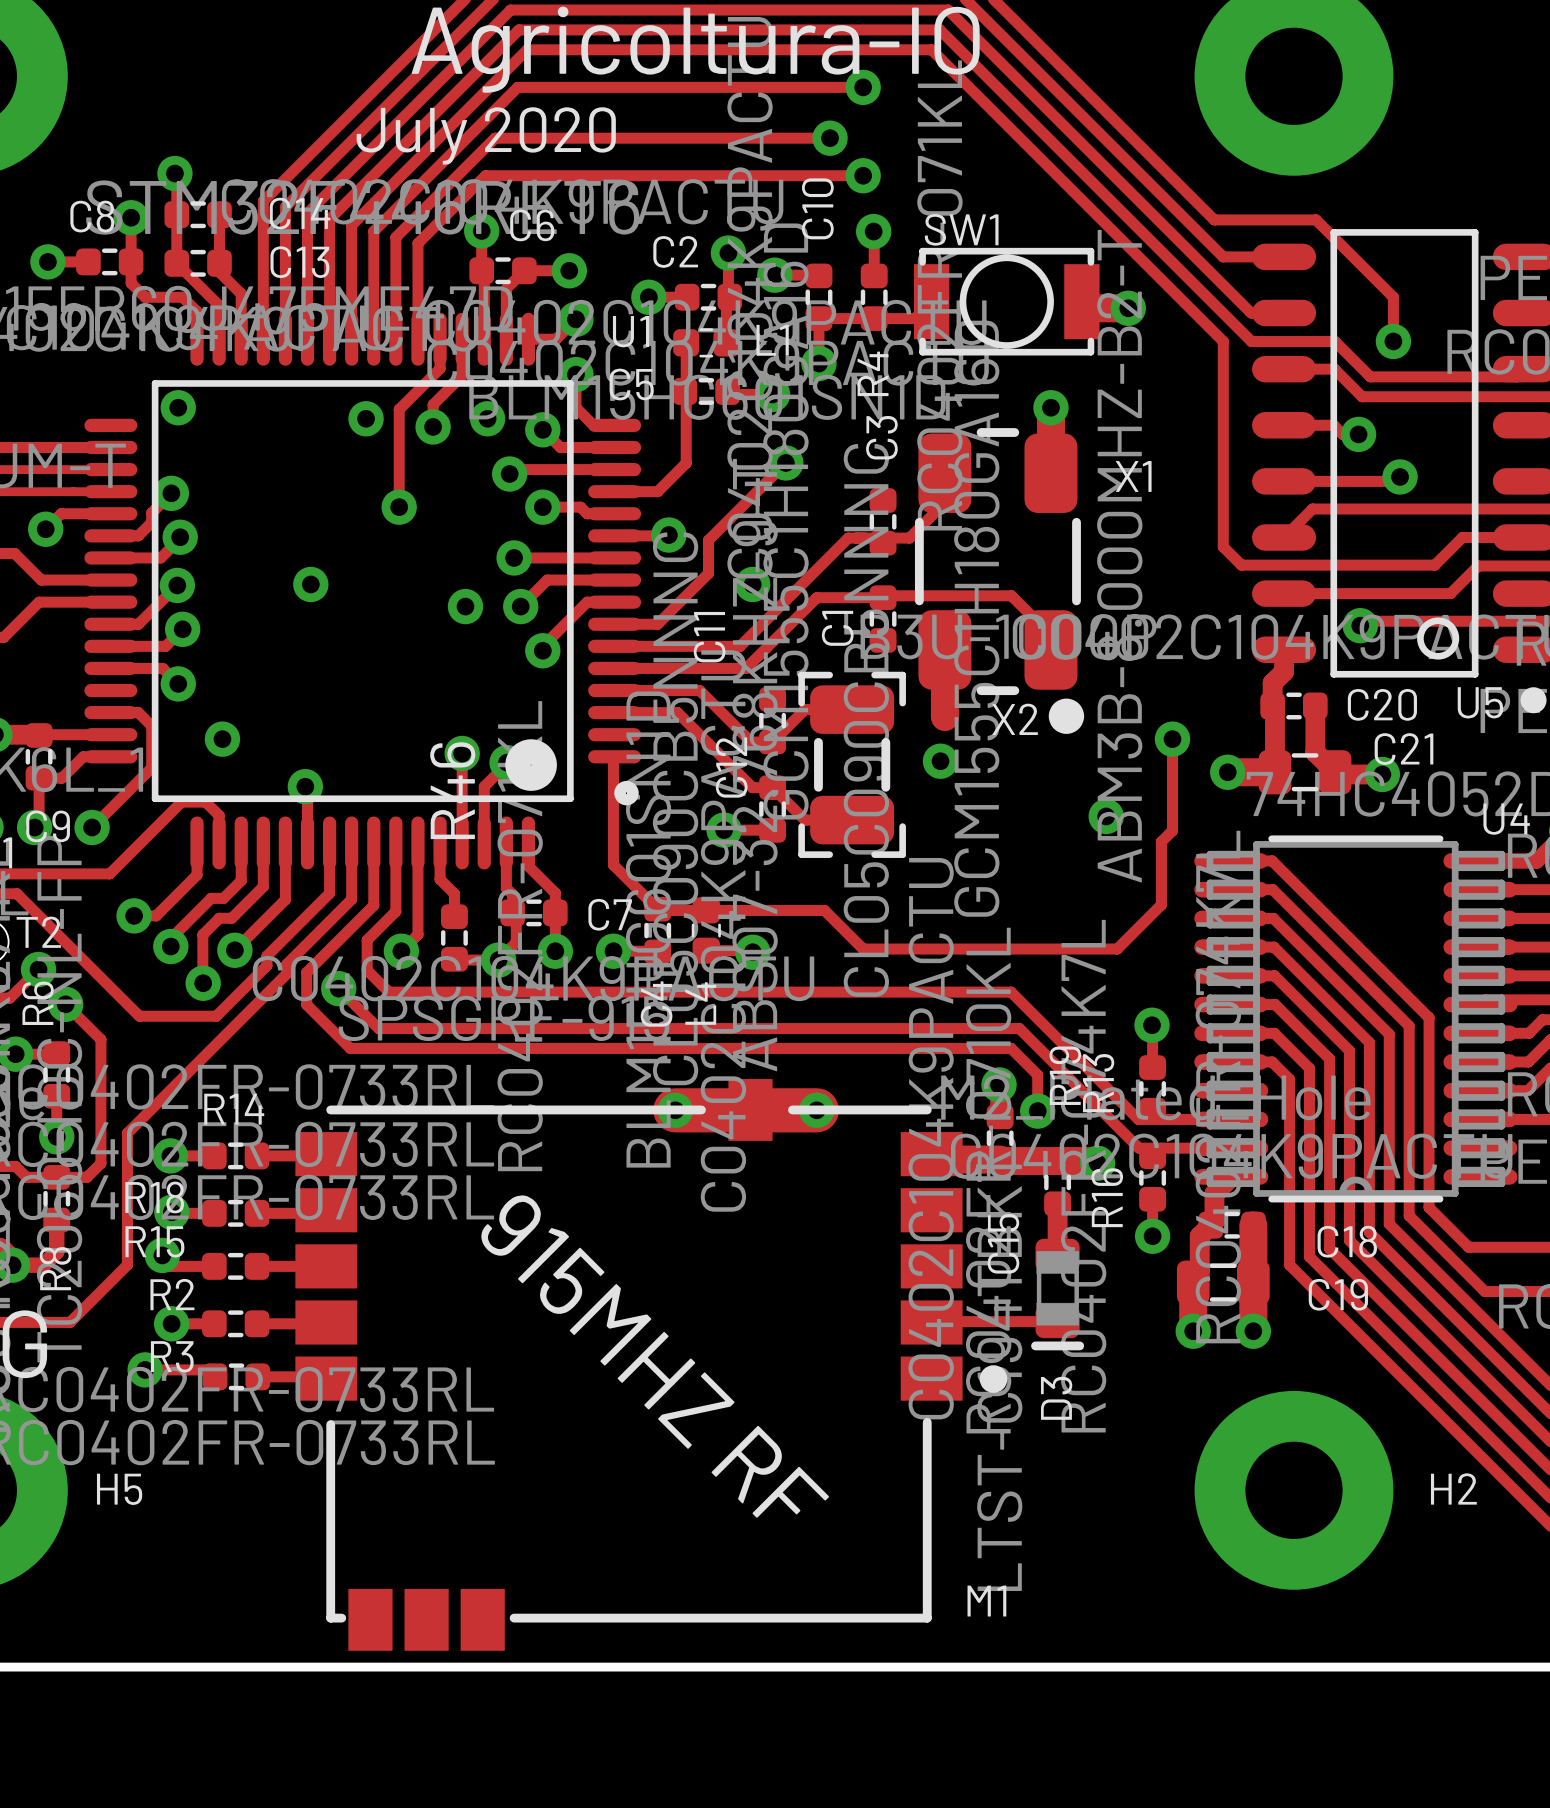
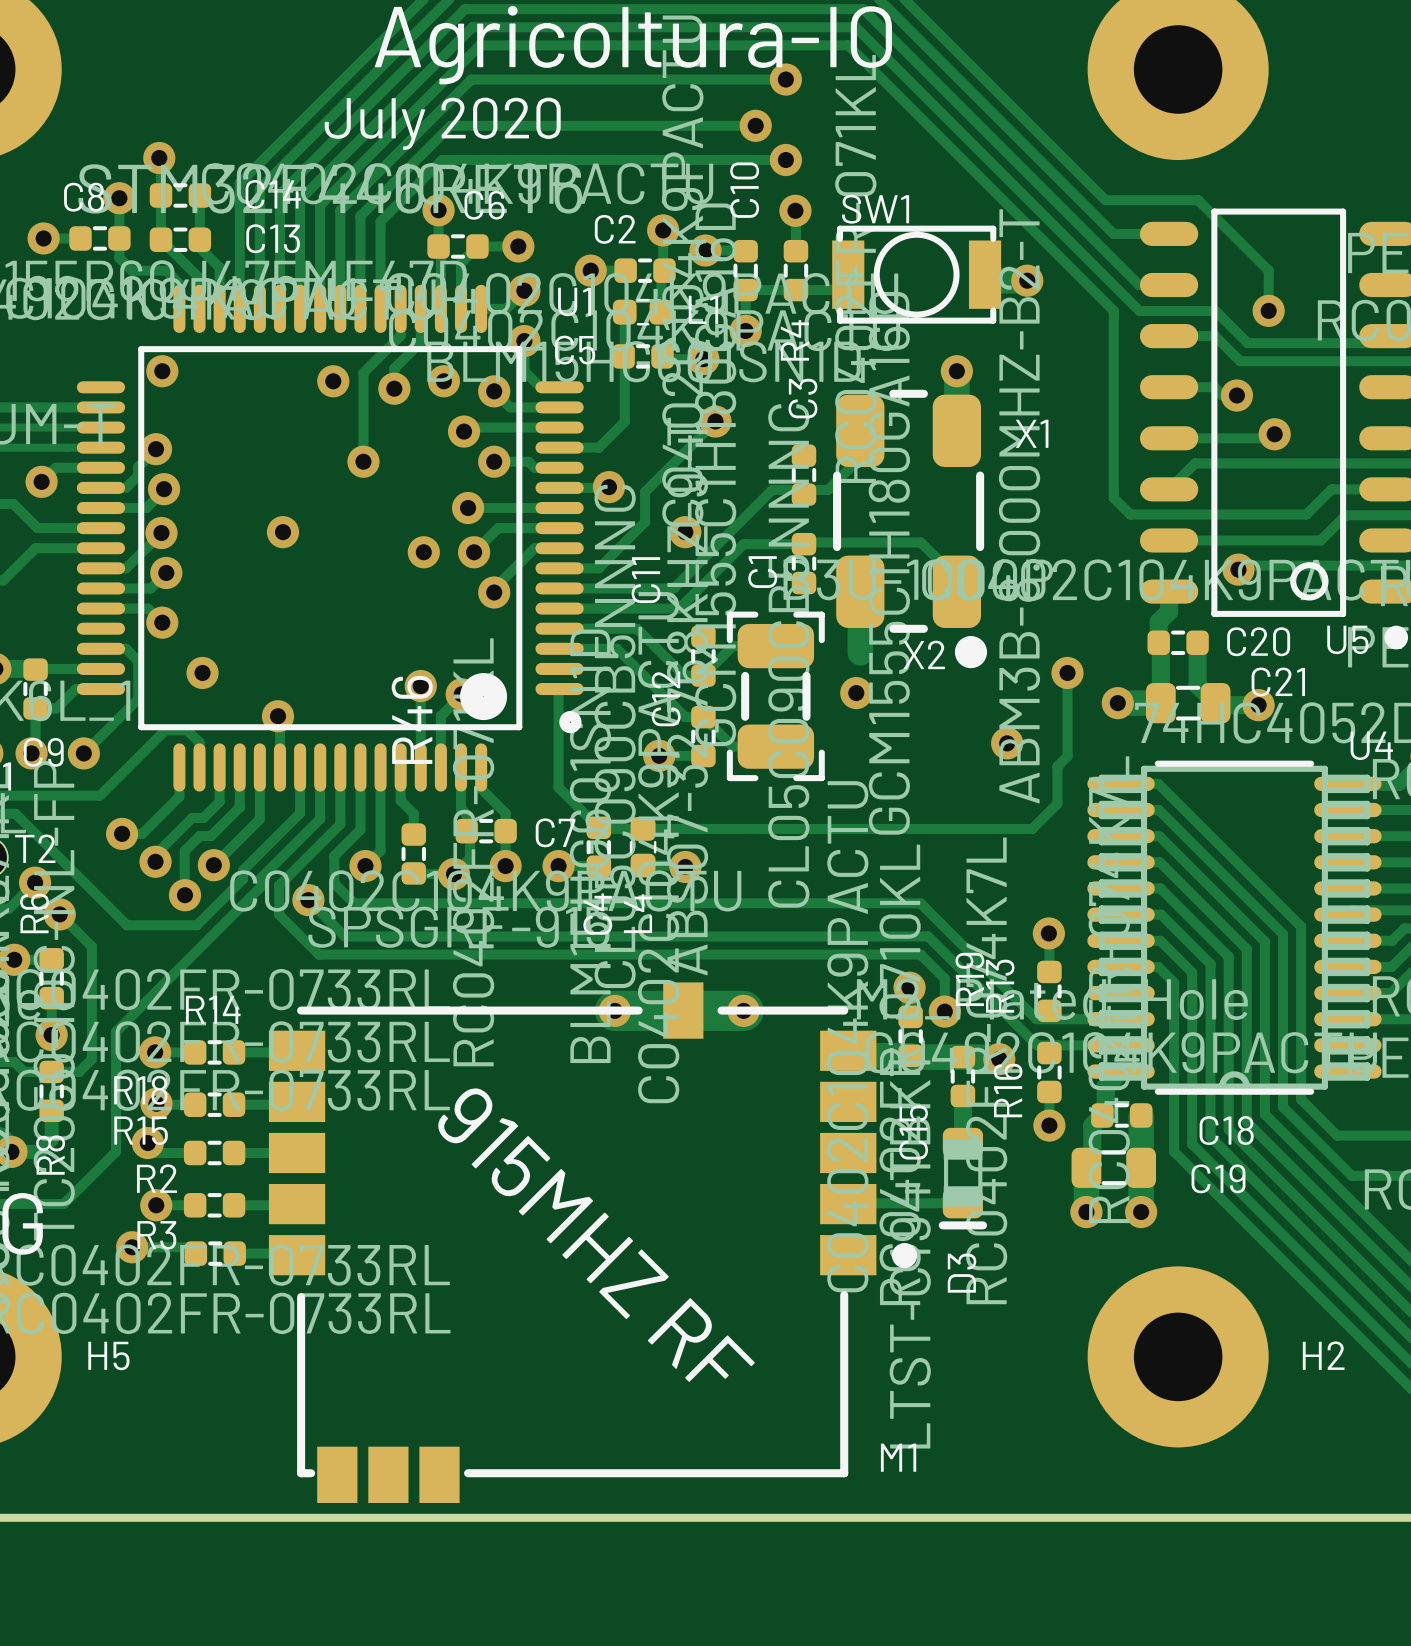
track: (1161, 882) (1161, 904) (1117, 949) (863, 949) (824, 910) -> (1057, 803) (1032, 828) (750, 828)

